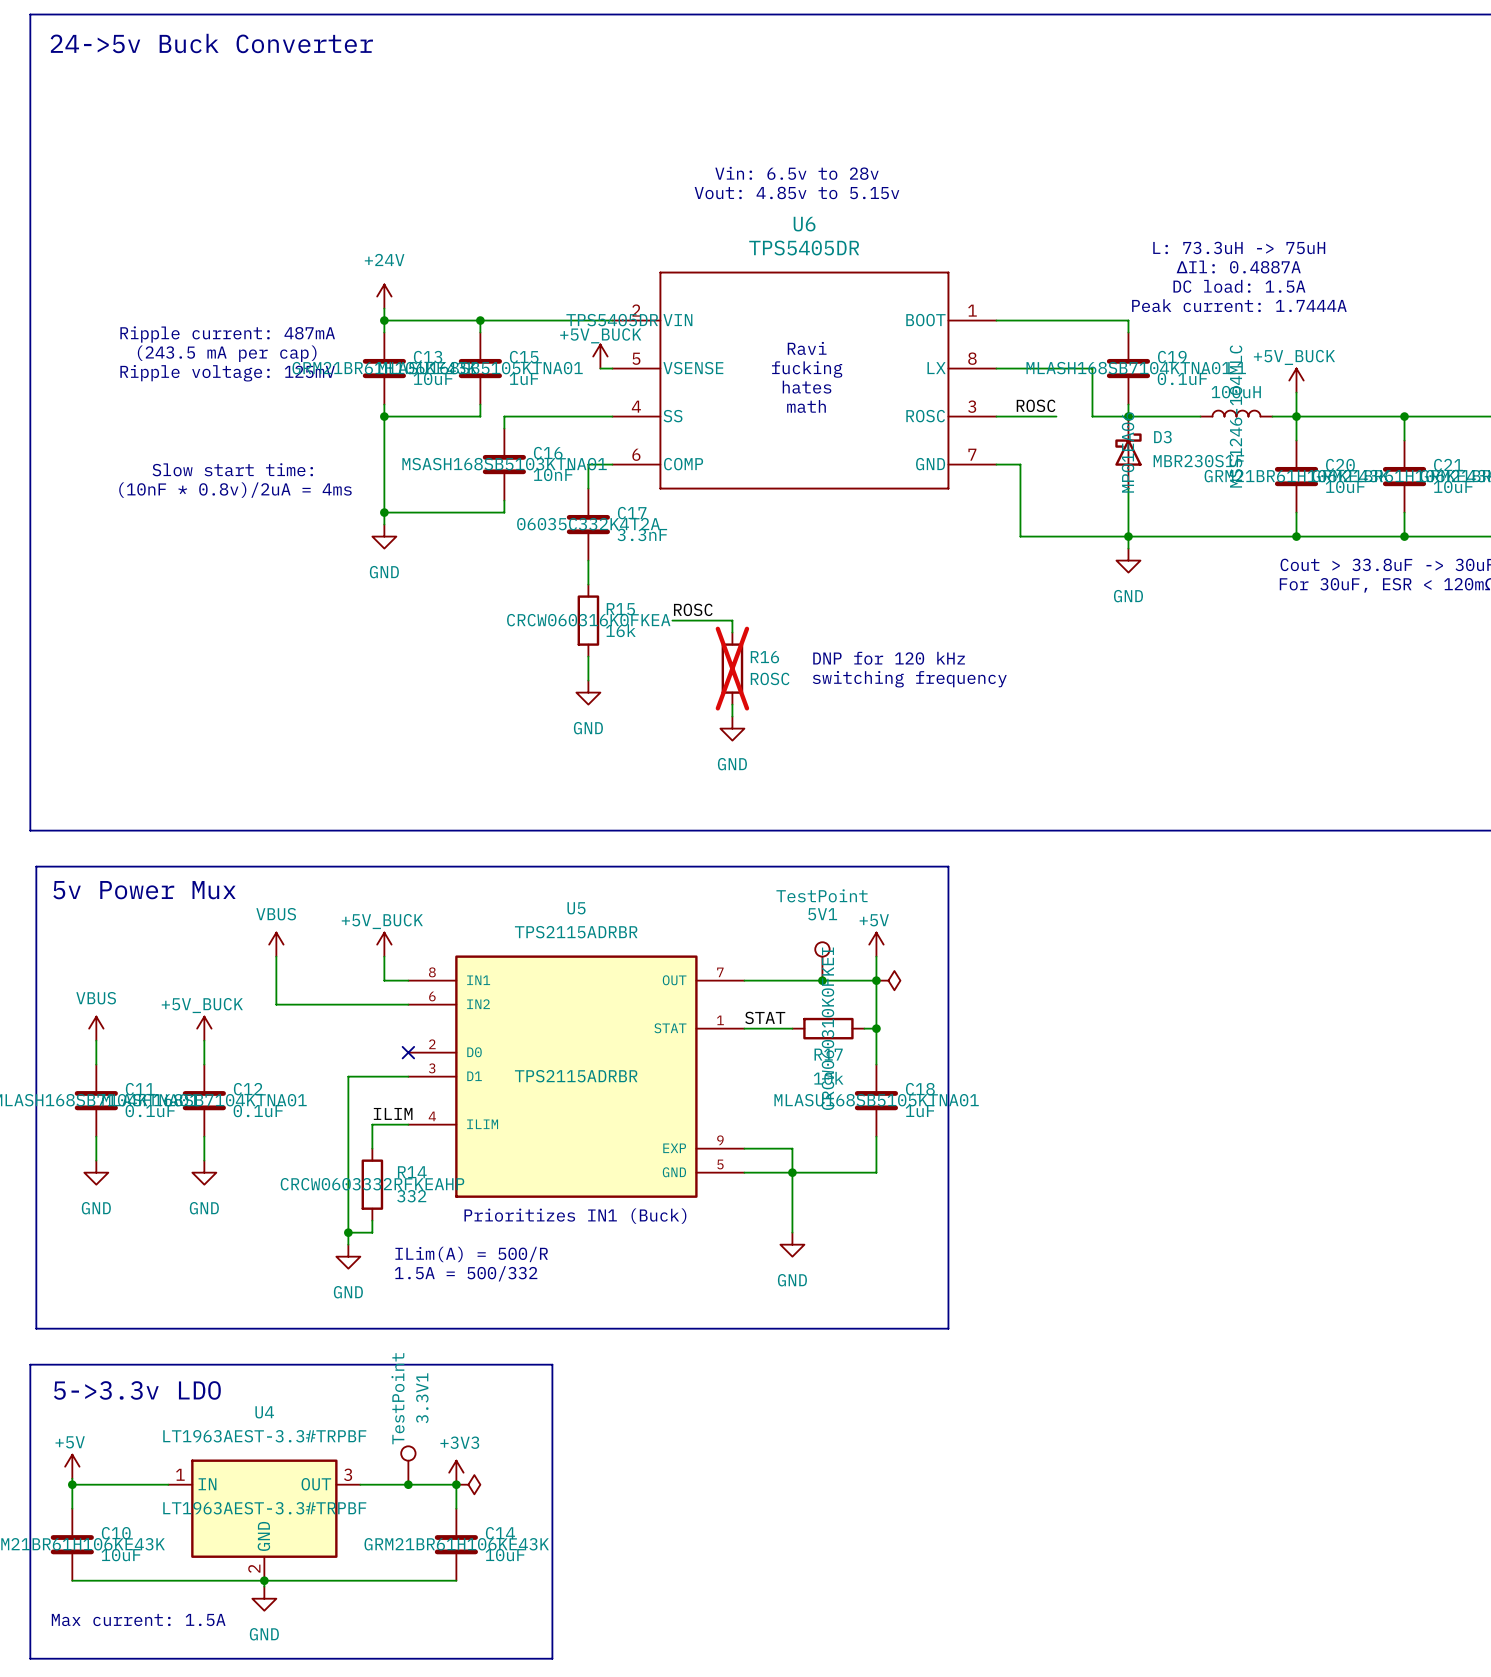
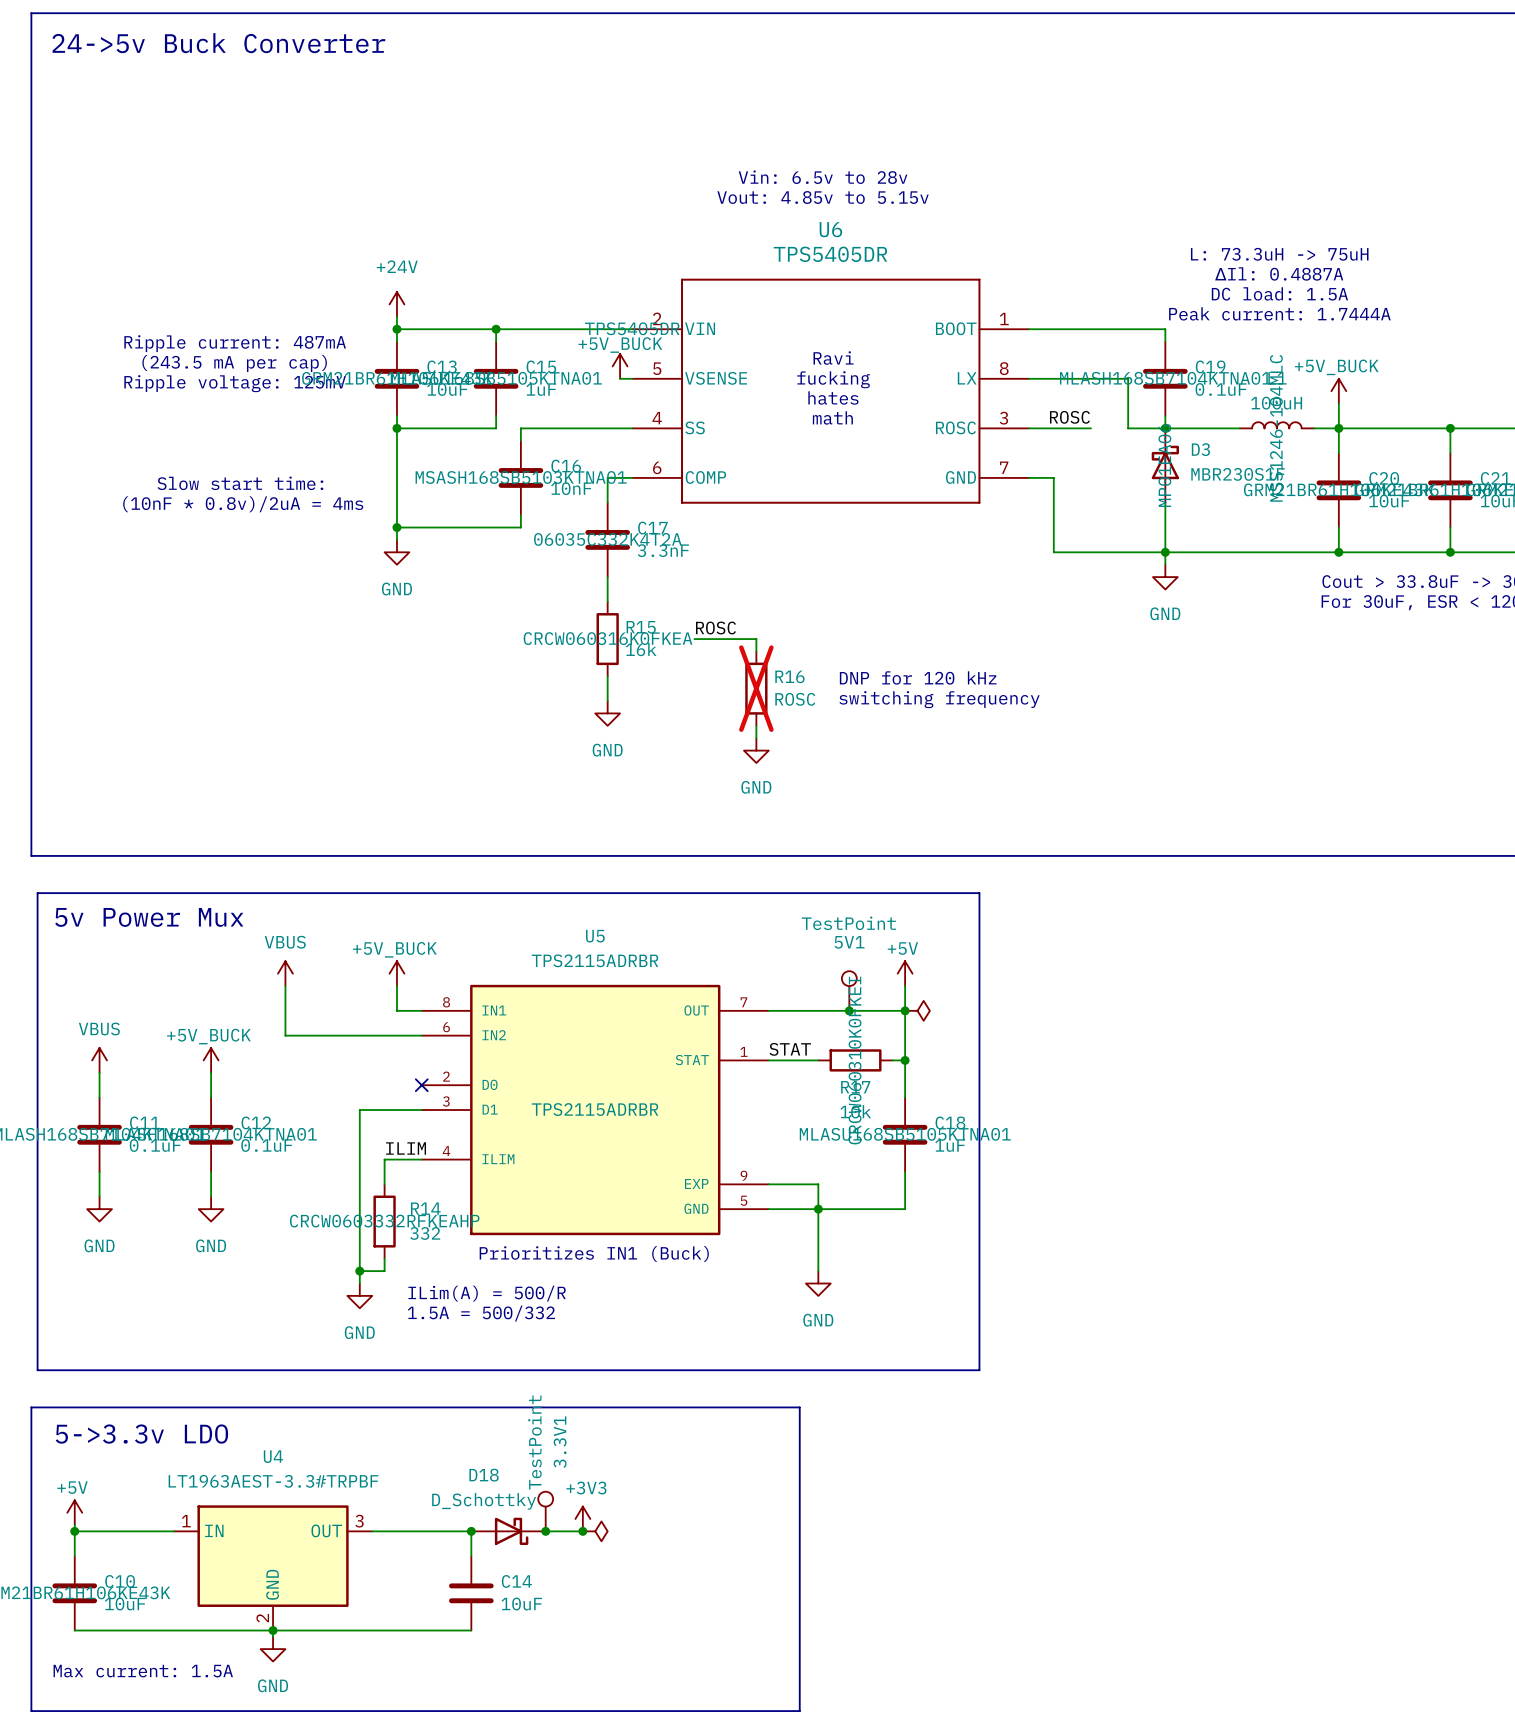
line: (552, 1364) (552, 1658) -> (570, 1407) (799, 1407) (799, 1711) (570, 1711)
3.3V1 position: (408, 1465) -> (545, 1511)
power symbol position: +3V3 (456, 1472) -> +3V3 (582, 1518)
junction: (408, 1484) -> none
power symbol position: (468, 1484) -> (595, 1531)
D18: none -> D_Schottky (508, 1531)
wire: none -> (545, 1531) (582, 1531)
junction: none -> (545, 1531)
junction: none -> (582, 1531)
U4 text: LT1963AEST-3.3#TRPBF (264, 1508) -> none
C14 text: GRM21BR61H106KE43K (456, 1544) -> none

